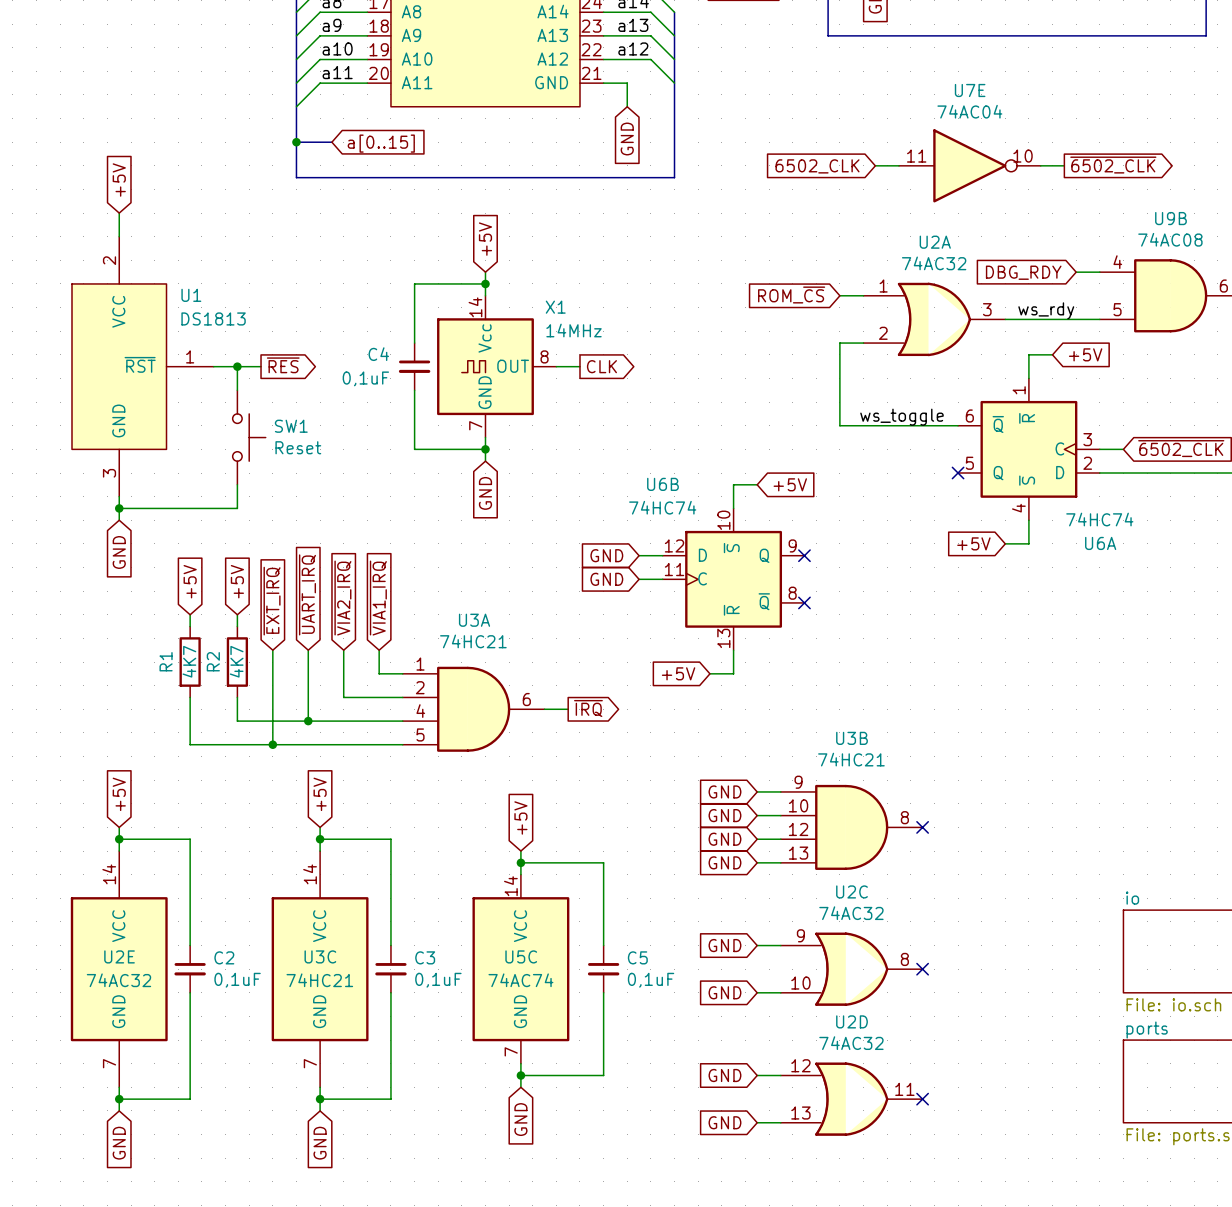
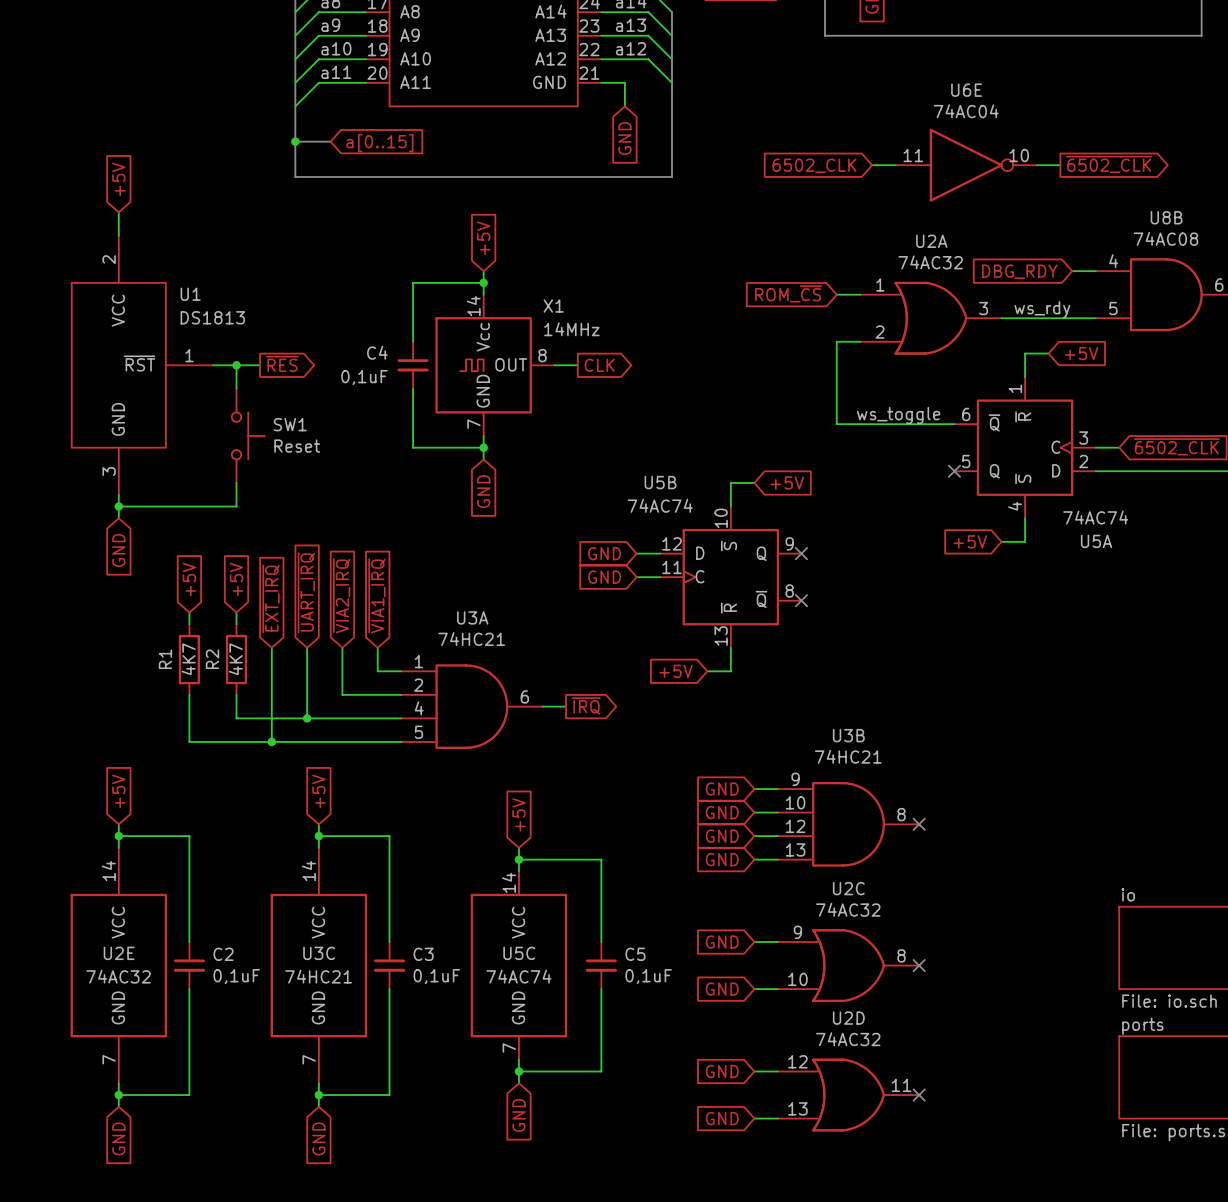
U7E name: U7E (970, 90) -> U6E (966, 90)
U9B name: U9B (1170, 218) -> U8B (1166, 217)
U6B name: U6B (662, 484) -> U5B (660, 482)
U6B value: 74HC74 (662, 507) -> 74AC74 (660, 505)
U6A value: 74HC74 (1099, 519) -> 74AC74 (1095, 517)
U6A name: U6A (1100, 543) -> U5A (1096, 541)

